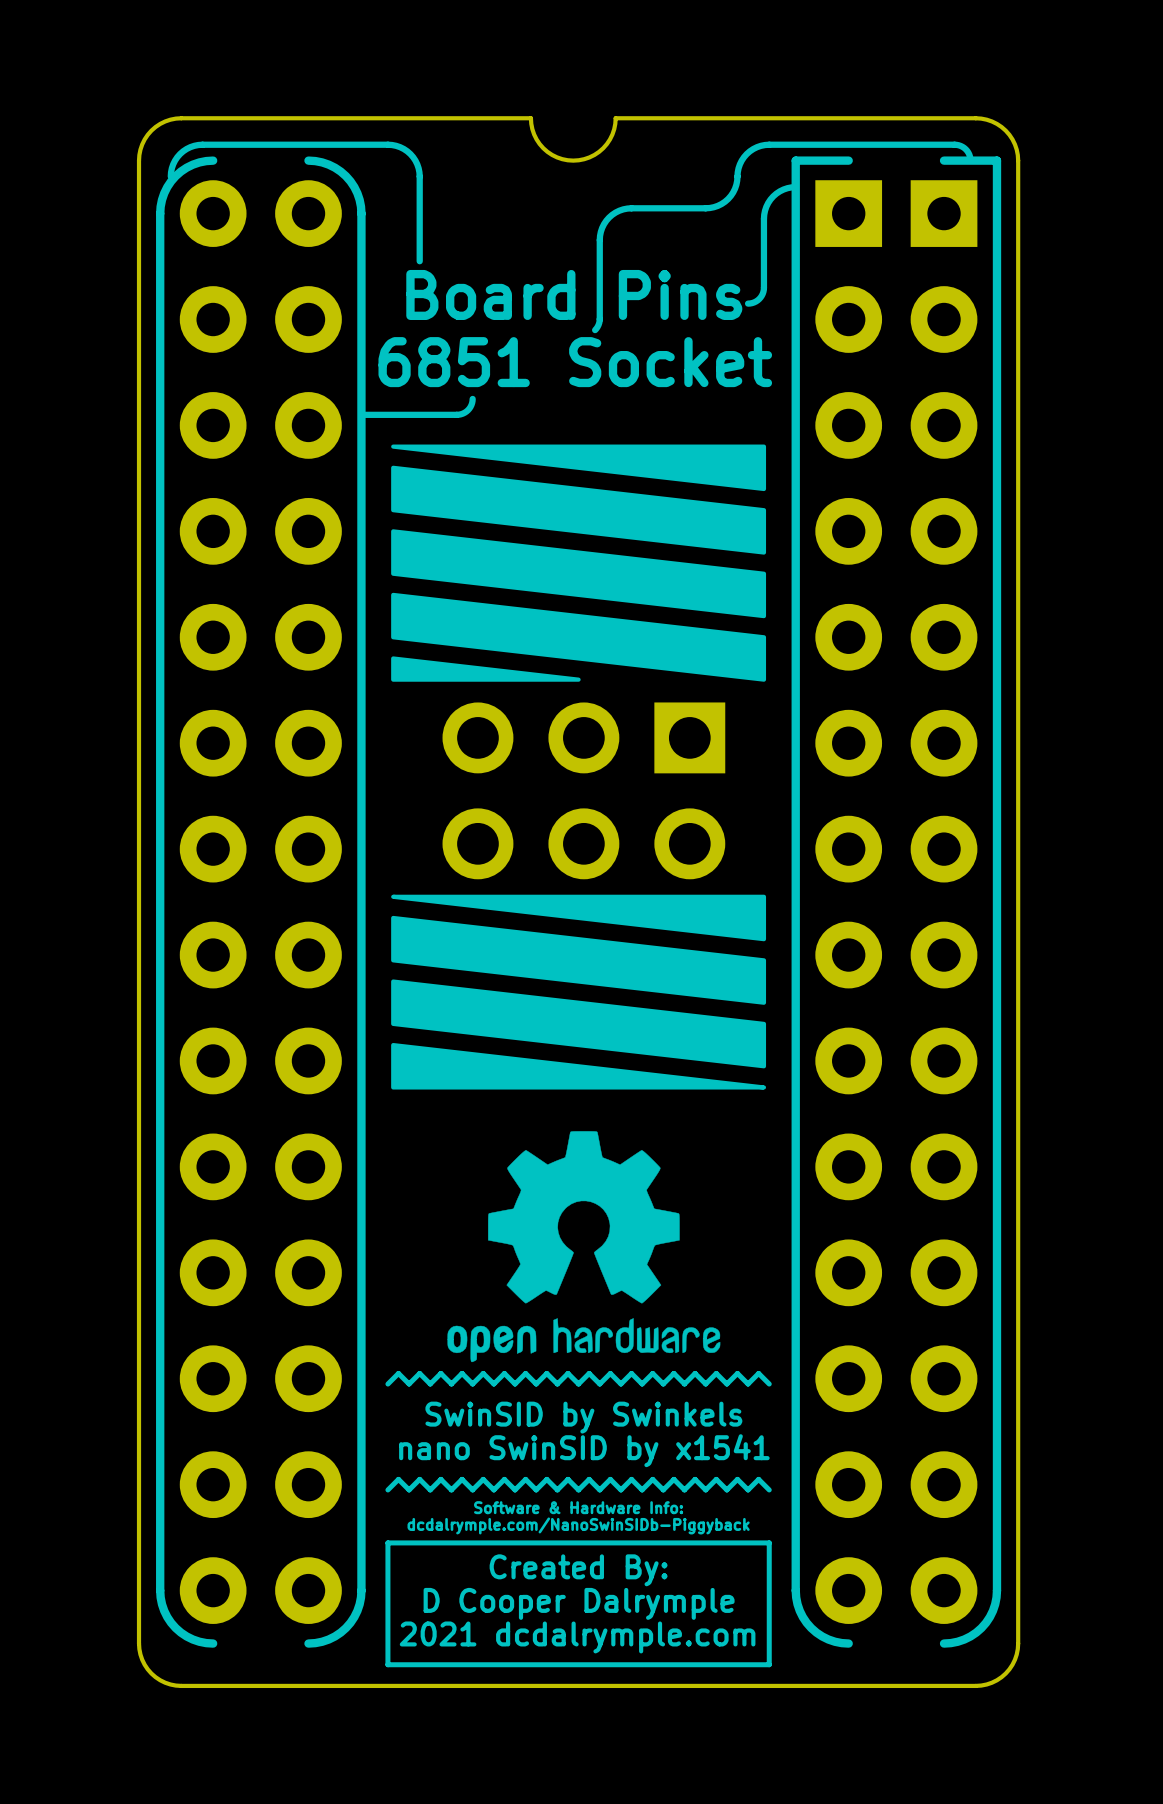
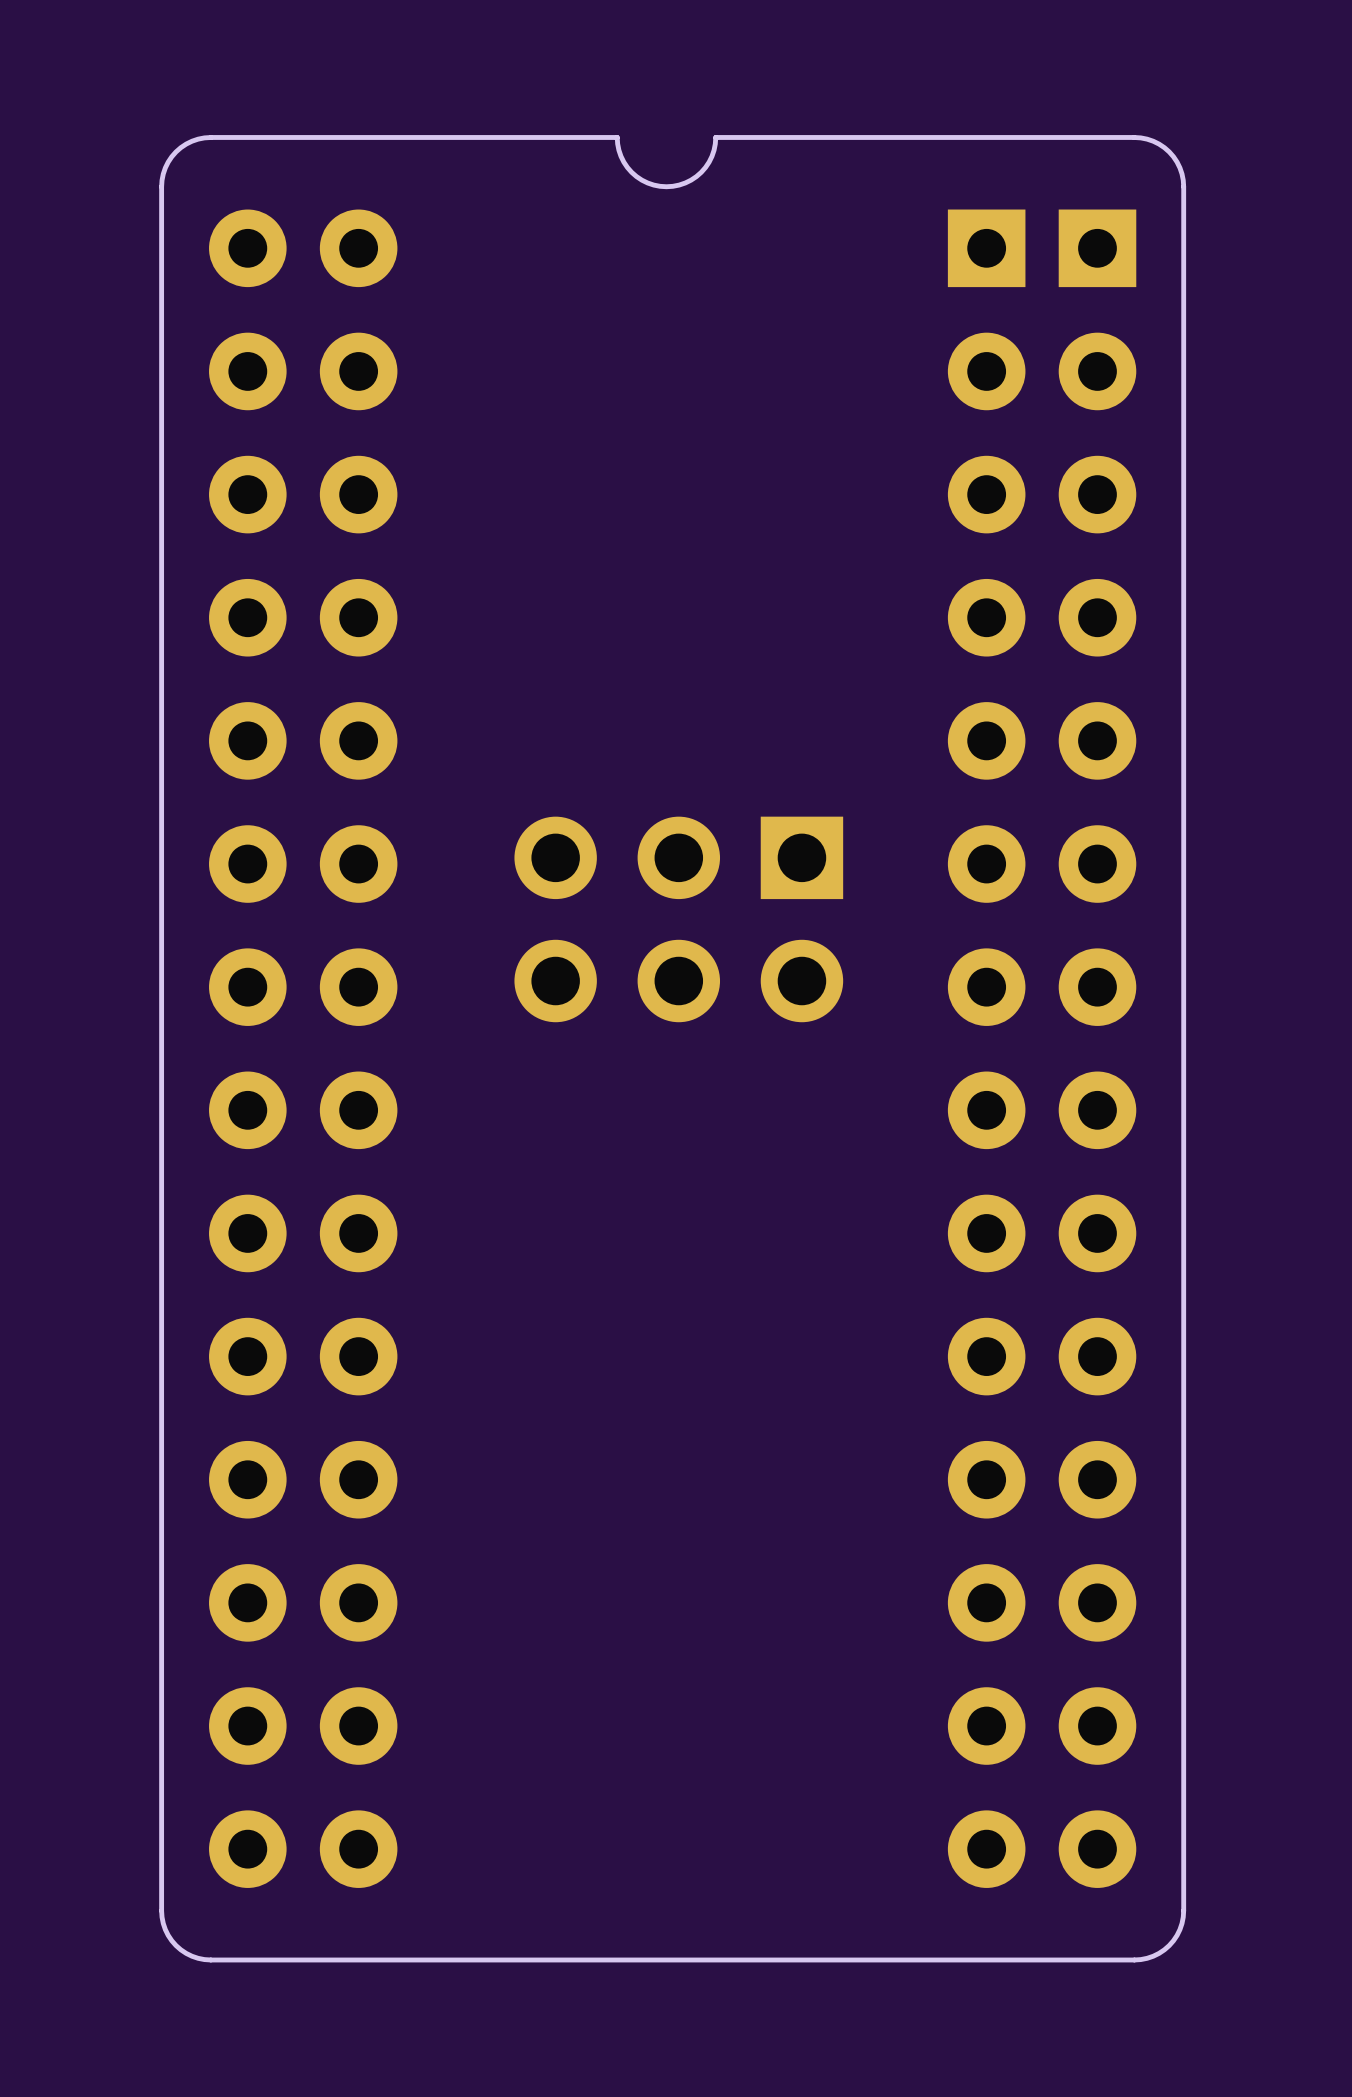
line: (213, 160) (192, 164) (175, 176) (164, 193) (160, 213) (160, 1590) (164, 1610) (175, 1628) (192, 1639) (213, 1643) -> none
line: (308, 160) (328, 164) (345, 176) (357, 193) (361, 213) (361, 1590) (357, 1610) (345, 1628) (328, 1639) (308, 1643) -> none
line: (848, 160) (795, 160) (795, 1590) (799, 1610) (811, 1628) (828, 1639) (848, 1643) -> none
line: (944, 160) (996, 160) (996, 1590) (992, 1610) (981, 1628) (964, 1639) (944, 1643) -> none
line: (970, 160) (965, 149) (954, 144) (769, 144) (757, 147) (749, 151) (741, 160) (736, 184) (730, 195) (717, 205) (705, 208) (627, 208) (619, 210) (609, 217) (602, 227) (600, 235) (599, 319) -> none
line: (170, 176) (173, 164) (177, 157) (186, 148) (198, 145) (387, 144) (400, 147) (413, 157) (419, 172) (419, 261) -> none
line: (795, 187) (783, 189) (776, 193) (766, 206) (763, 218) (763, 289) (759, 298) (748, 303) -> none
text: Board Pins (574, 294) -> none
line: (599, 318) (595, 330) -> none
text: 6851 Socket (575, 362) -> none
line: (472, 398) (468, 410) (458, 414) (361, 414) -> none
drawing: [391, 444, 767, 682] -> none
drawing: [391, 894, 767, 1363] -> none
line: (769, 1384) (758, 1373) (748, 1384) (737, 1373) (726, 1384) (716, 1373) (705, 1384) (695, 1373) (684, 1384) (673, 1373) (663, 1384) (652, 1373) (642, 1384) (631, 1373) (620, 1384) (610, 1373) (599, 1384) (589, 1373) (578, 1384) (568, 1373) (557, 1384) (546, 1373) (536, 1384) (525, 1373) (515, 1384) (504, 1373) (493, 1384) (483, 1373) (472, 1384) (462, 1373) (451, 1384) (440, 1373) (430, 1384) (419, 1373) (409, 1384) (398, 1373) (387, 1384) -> none
text: SwinSID by Swinkels (583, 1417) -> none
text: nano SwinSID by x1541 (584, 1450) -> none
line: (769, 1489) (758, 1479) (748, 1489) (737, 1479) (726, 1489) (716, 1479) (705, 1489) (695, 1479) (684, 1489) (673, 1479) (663, 1489) (652, 1479) (642, 1489) (631, 1479) (620, 1489) (610, 1479) (599, 1489) (589, 1479) (578, 1489) (568, 1479) (557, 1489) (546, 1479) (536, 1489) (525, 1479) (515, 1489) (504, 1479) (493, 1489) (483, 1479) (472, 1489) (462, 1479) (451, 1489) (440, 1479) (430, 1489) (419, 1479) (409, 1489) (398, 1479) (387, 1489) -> none
text: Software & Hardware Info: (578, 1507) -> none
text: dcdalrymple.com/NanoSwinSIDb-Piggyback (578, 1525) -> none
line: (769, 1542) (769, 1664) (387, 1664) (387, 1542) (769, 1542) -> none
text: Created By: (578, 1570) -> none
text: D Cooper Dalrymple (579, 1603) -> none
text: 2021 dcdalrymple.com (577, 1637) -> none

